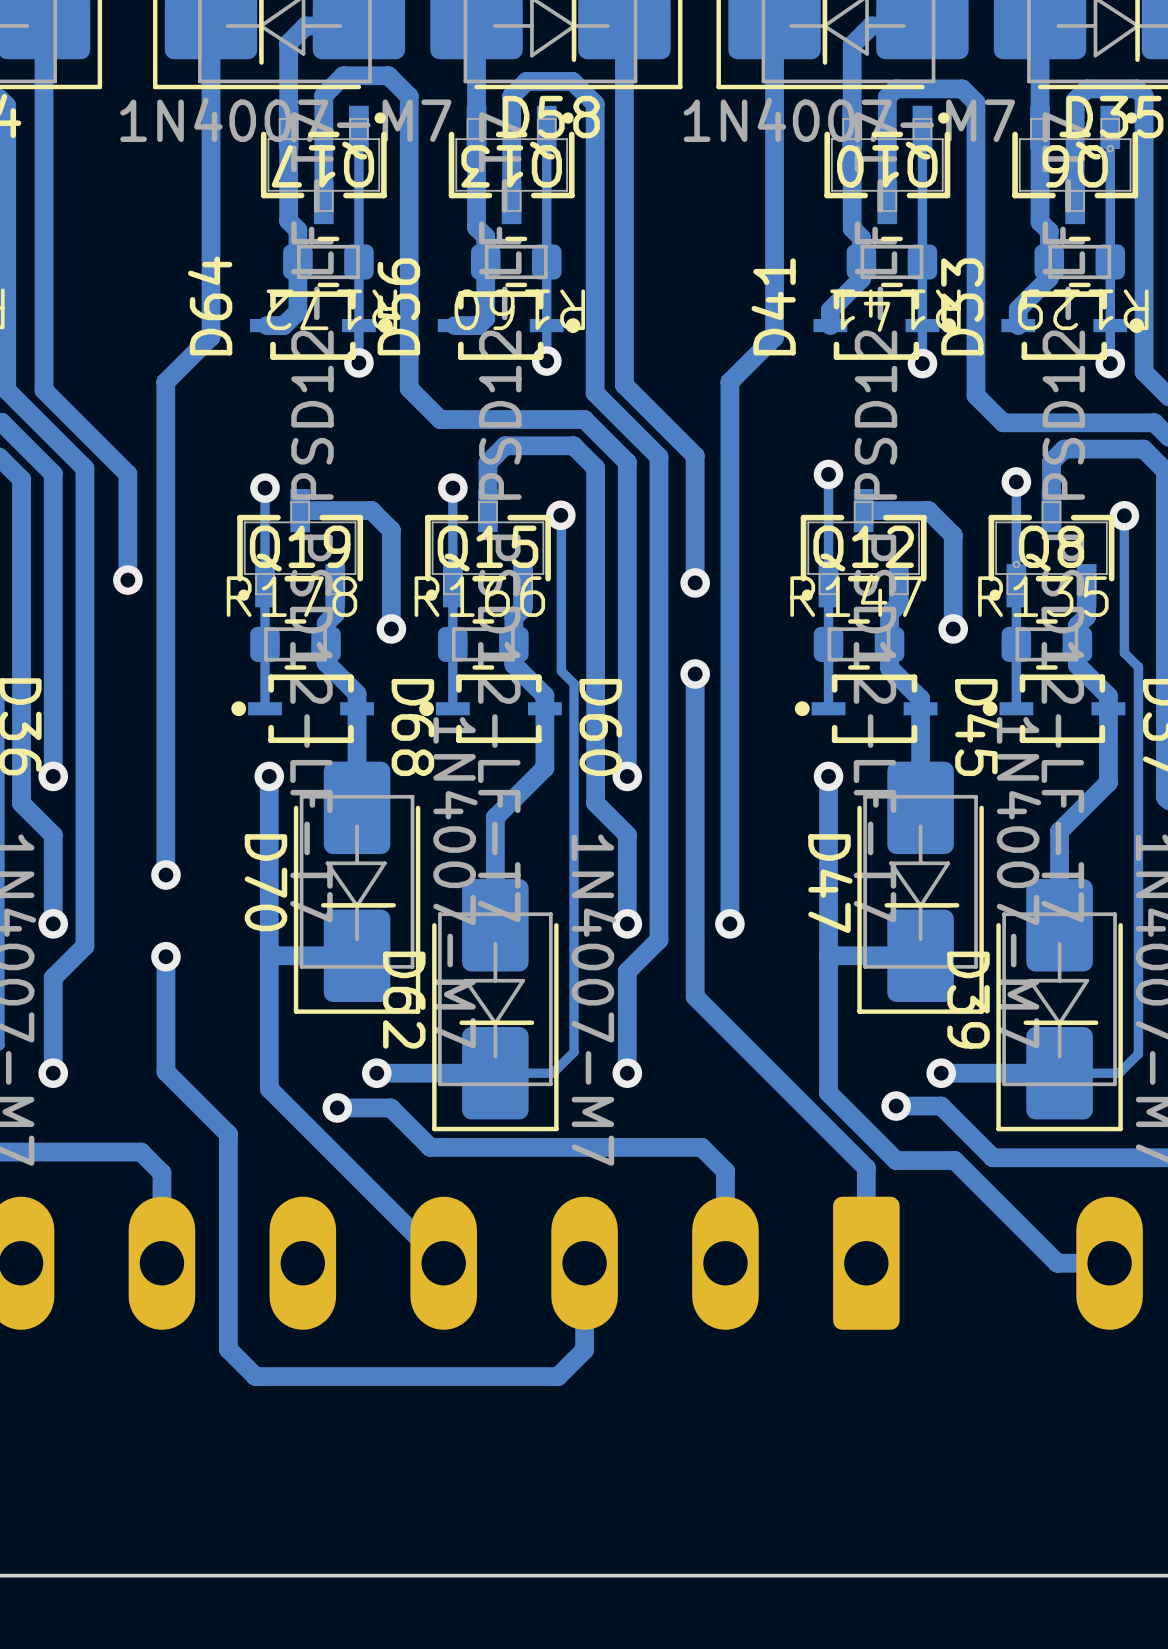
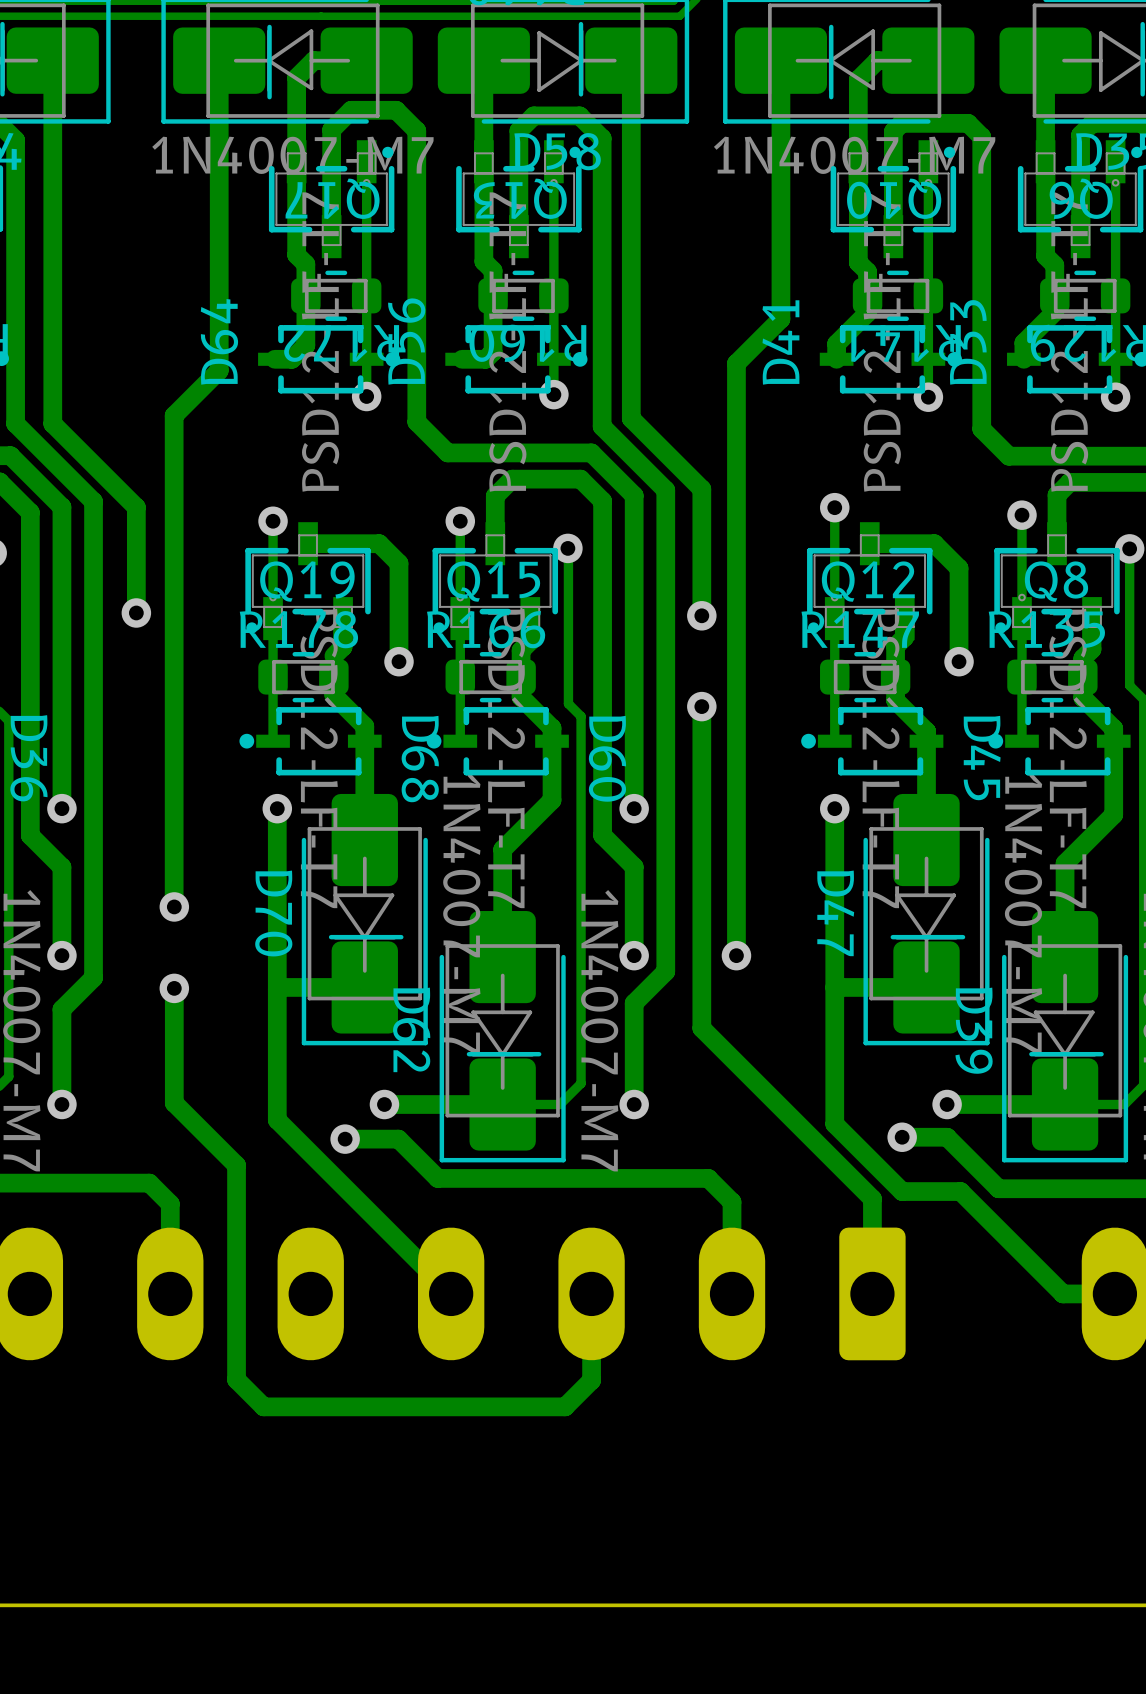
track: (774, 285) (774, 337) (729, 381) -> (780, 319) (736, 363) (736, 415)

